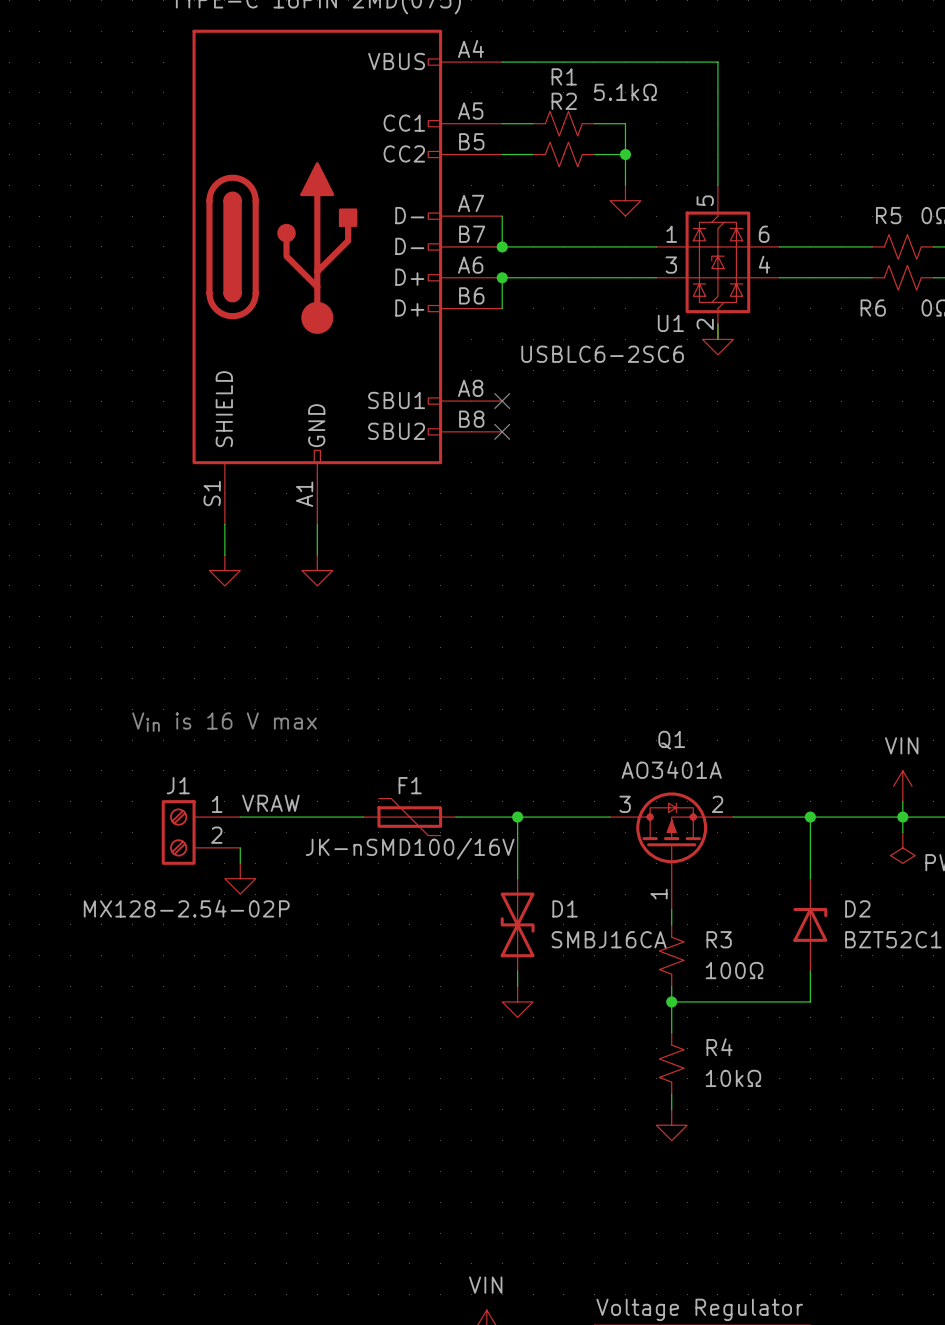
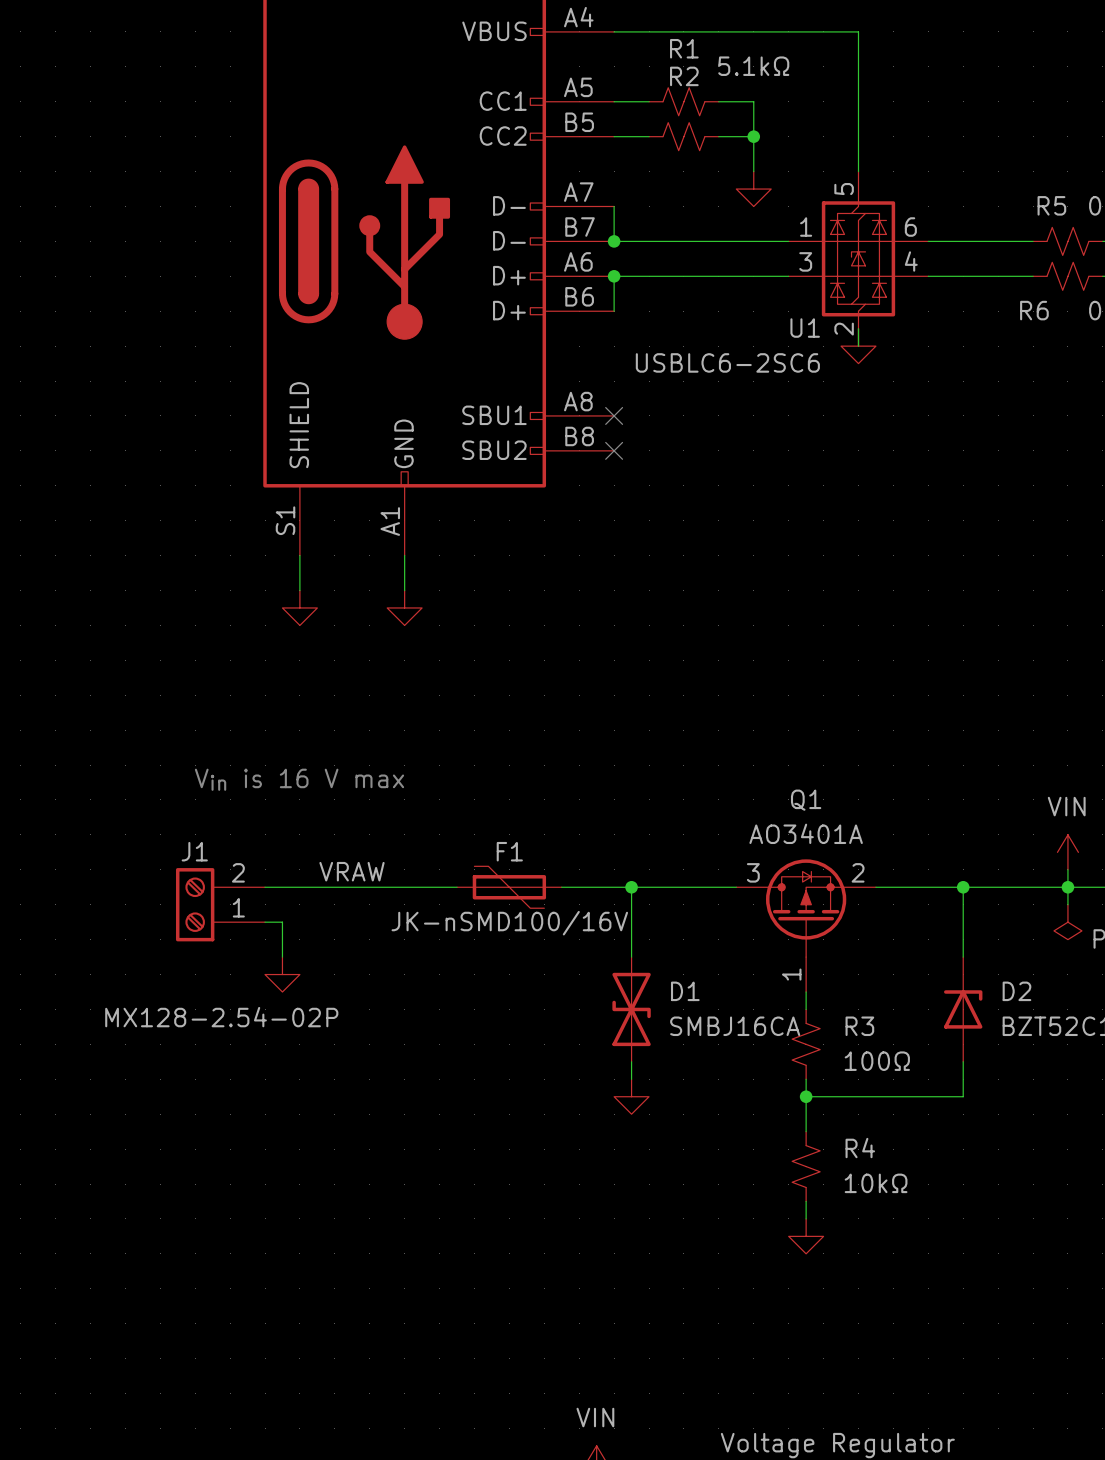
J1 flip: as is (178, 832) -> up-down (195, 904)
wire: none -> (265, 922) (282, 922) (282, 957)
wire: (240, 847) (240, 863) -> none
power symbol position: (240, 878) -> (282, 974)
J1 value position: MX128-2.54-02P (186, 908) -> MX128-2.54-02P (221, 1017)

